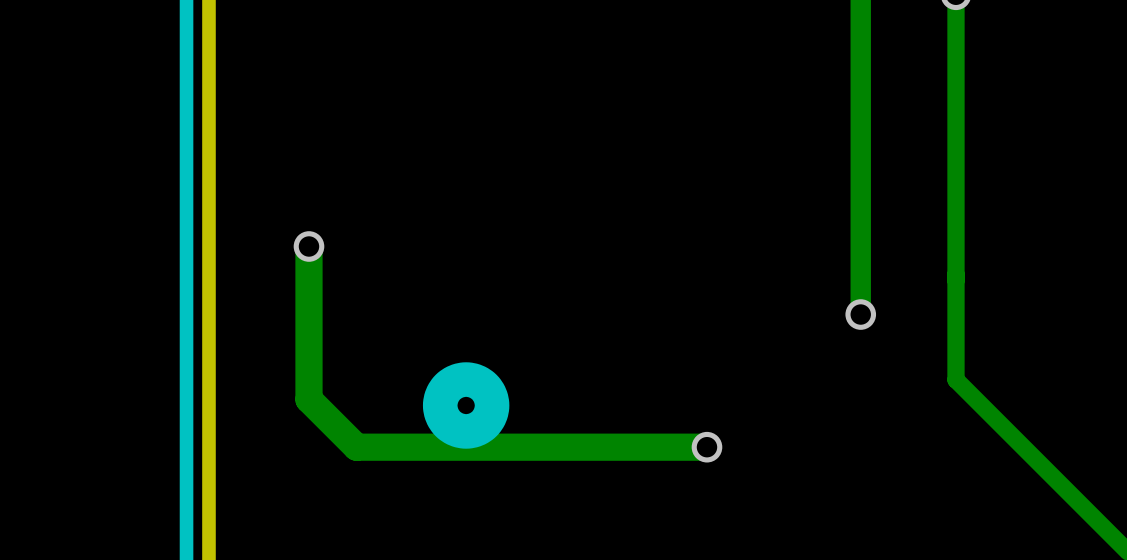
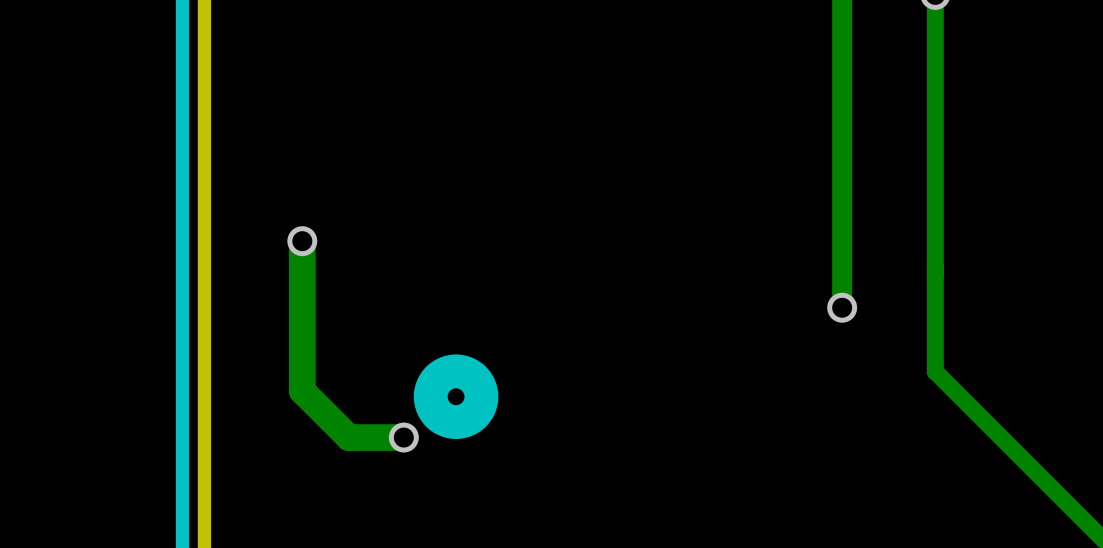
track: (706, 447) (412, 447) -> none
via position: (706, 447) -> (403, 437)

